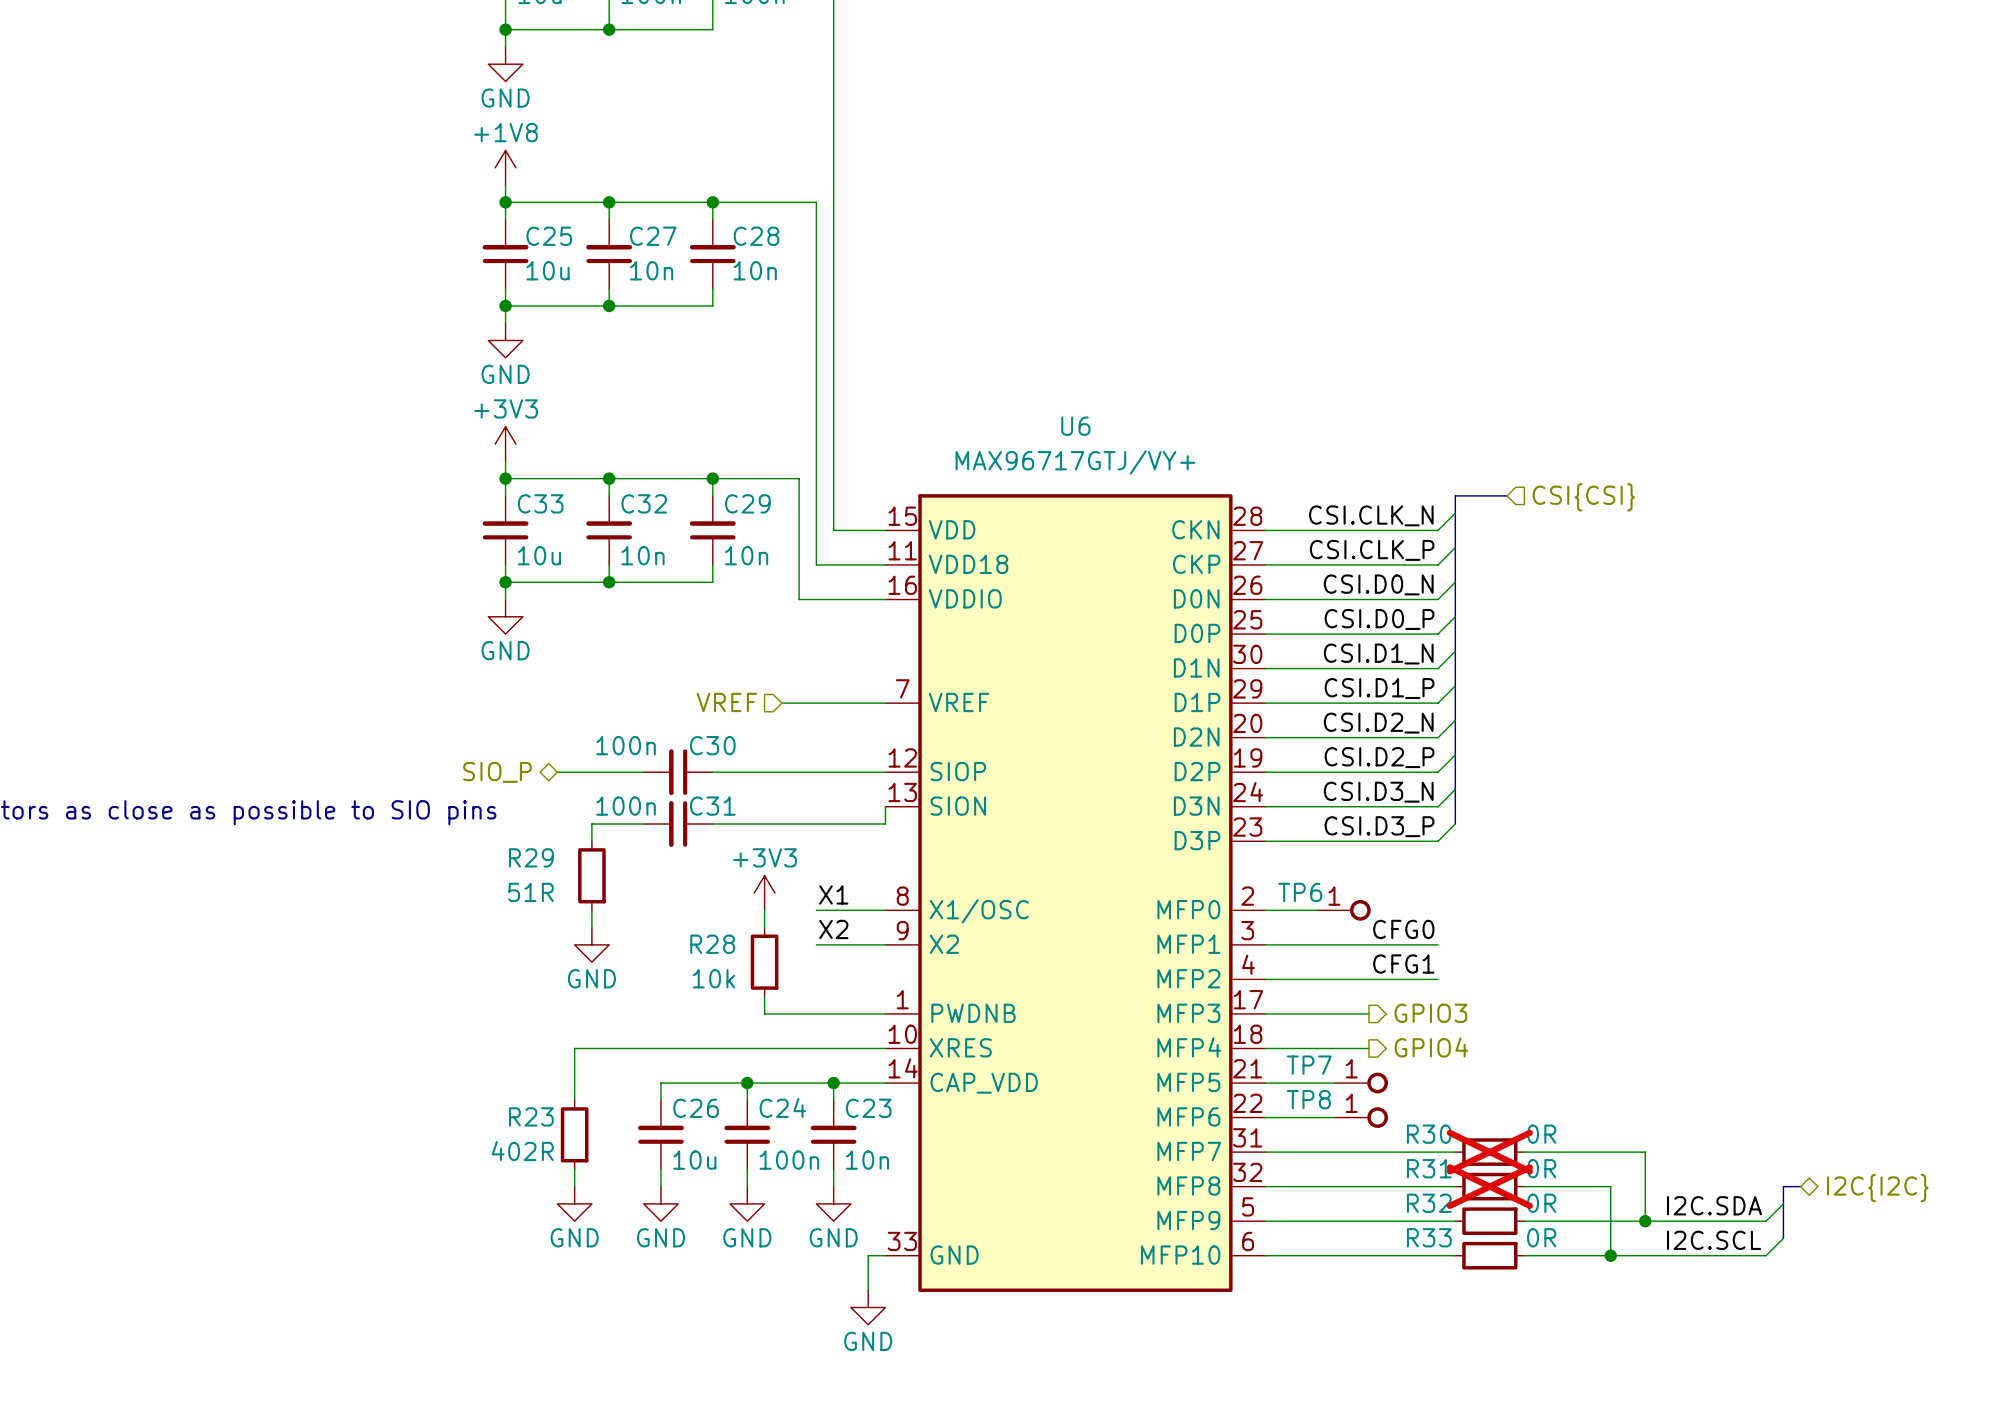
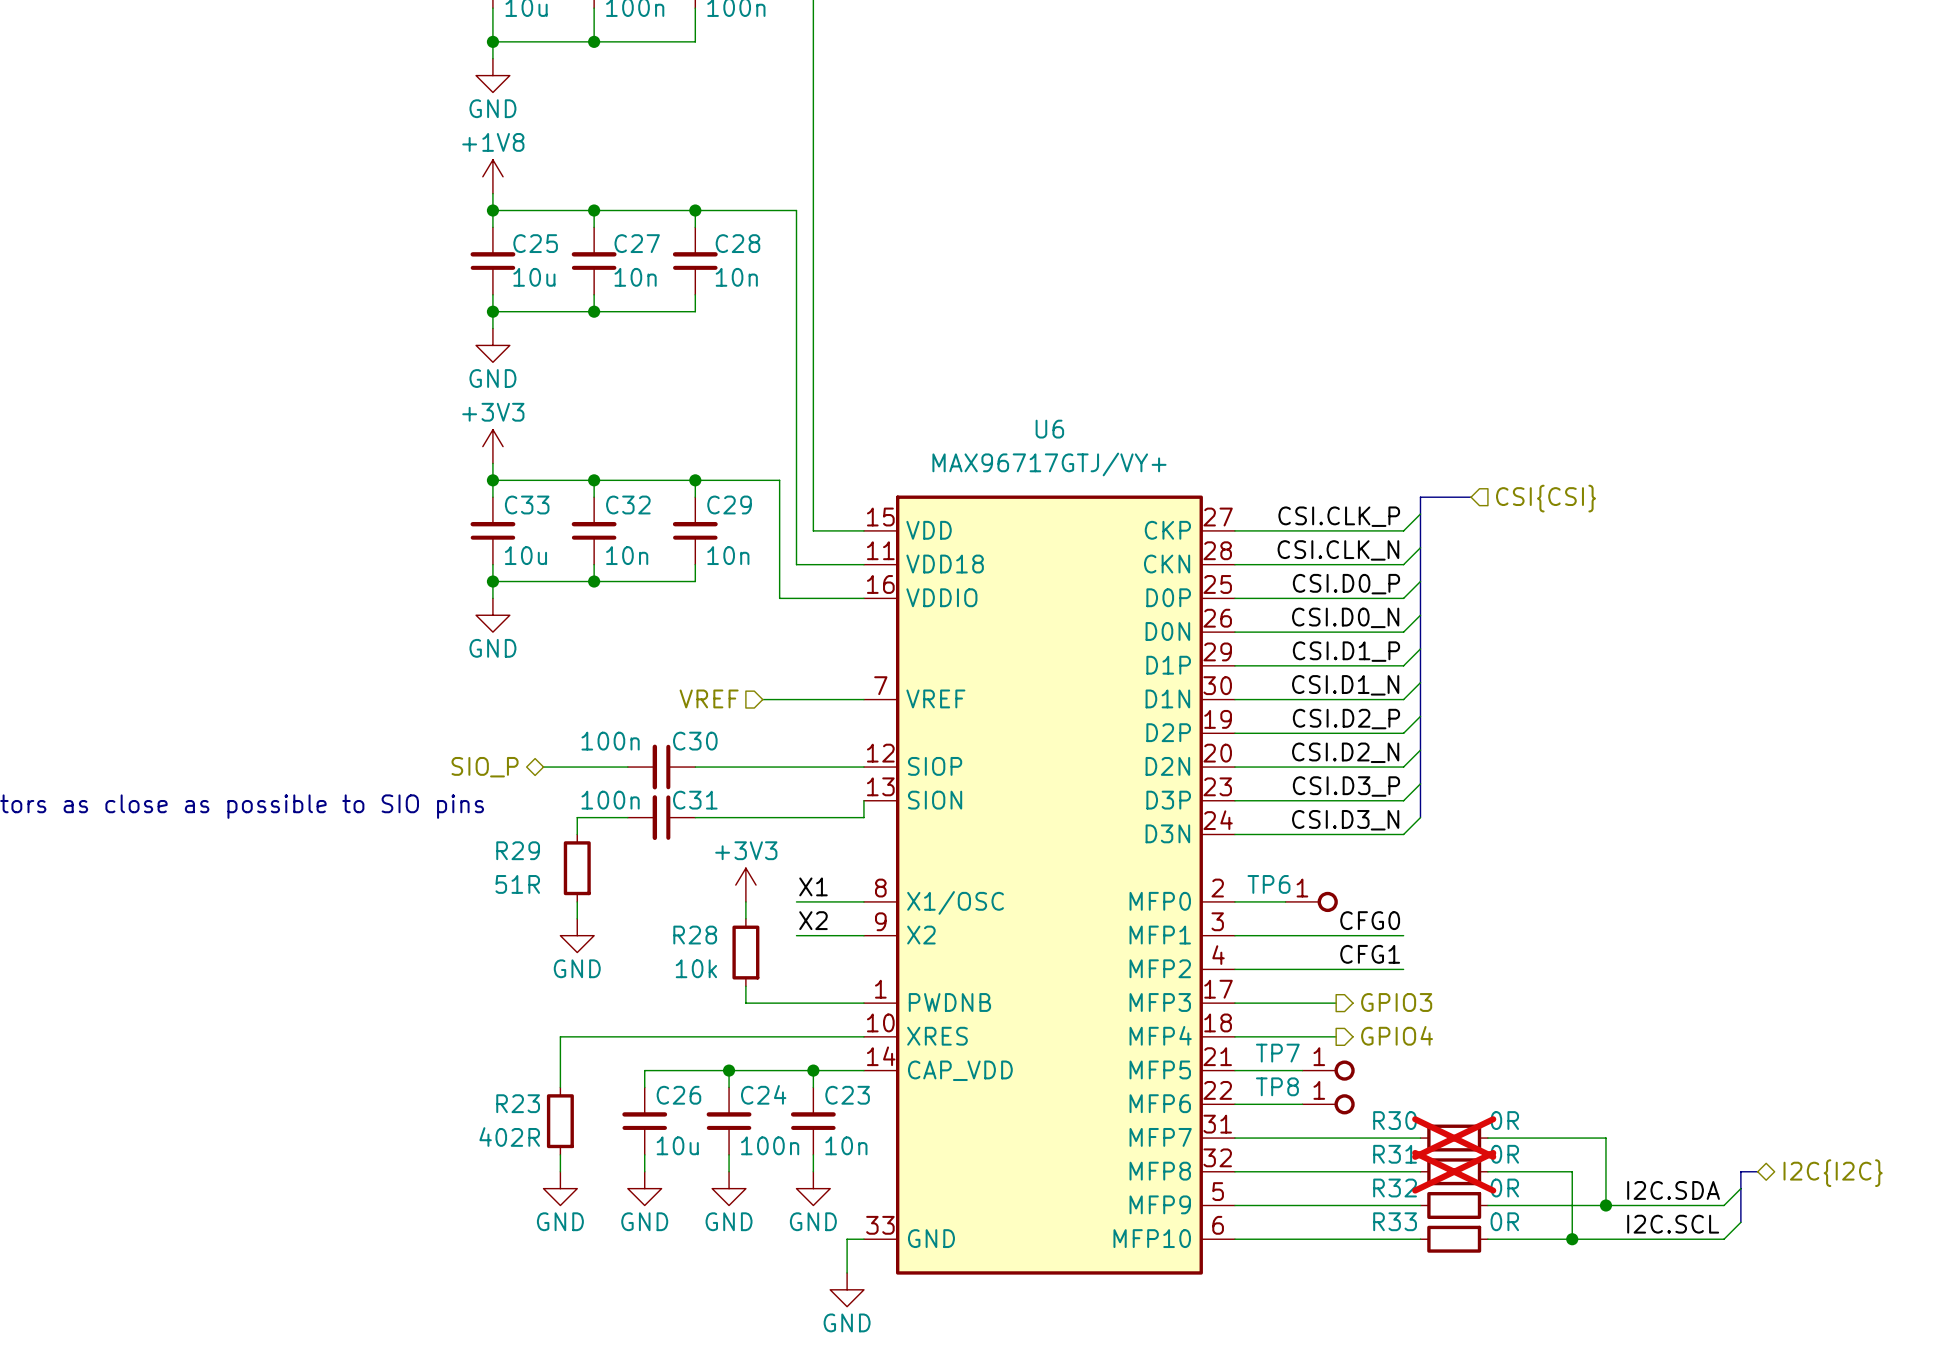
U6 symbol: [885, 494, 1266, 1292] -> [863, 495, 1235, 1275]
label: CSI.CLK_N (1371, 515) -> CSI.CLK_P (1339, 516)
label: CSI.CLK_P (1372, 550) -> CSI.CLK_N (1338, 550)
label: CSI.D0_N (1378, 584) -> CSI.D0_P (1346, 584)
label: CSI.D0_P (1379, 619) -> CSI.D0_N (1345, 617)
label: CSI.D1_N (1378, 654) -> CSI.D1_P (1346, 651)
label: CSI.D1_P (1379, 688) -> CSI.D1_N (1345, 685)
label: CSI.D2_N (1378, 723) -> CSI.D2_P (1346, 719)
label: CSI.D2_P (1379, 757) -> CSI.D2_N (1345, 752)
label: CSI.D3_N (1378, 792) -> CSI.D3_P (1346, 786)
label: CSI.D3_P (1379, 826) -> CSI.D3_N (1345, 820)

